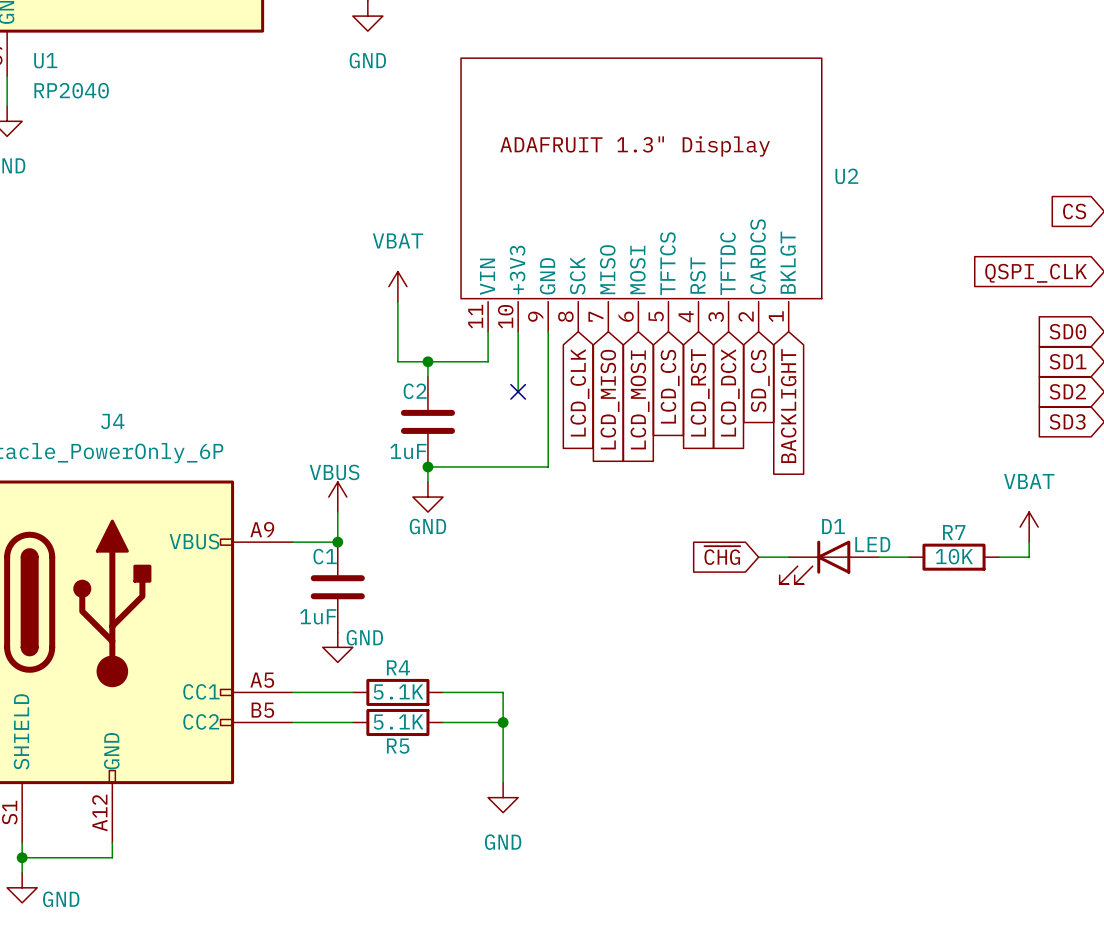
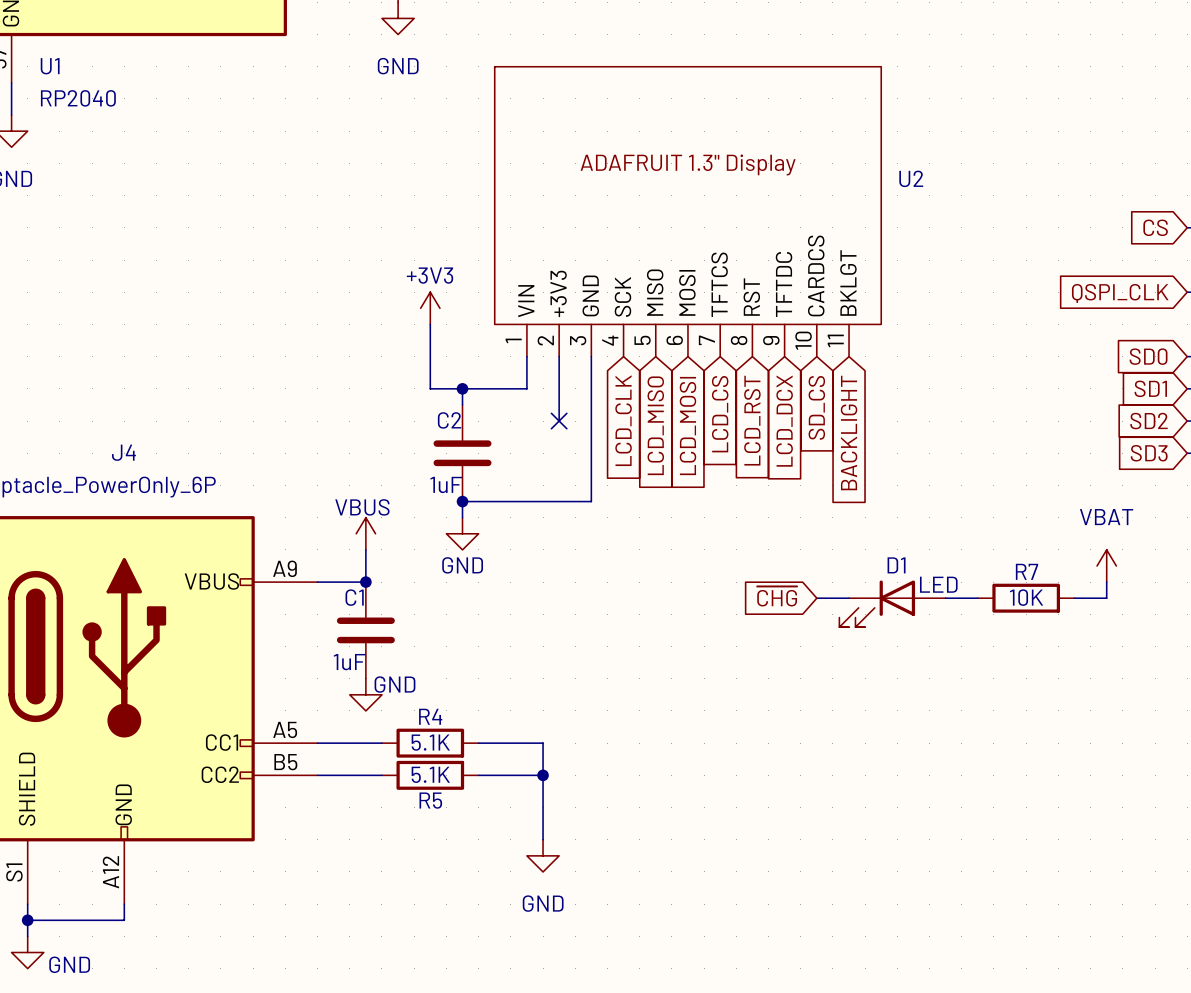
U2 symbol: [461, 58, 822, 332] -> [494, 66, 882, 357]
power symbol: VBAT (397, 286) -> +3V3 (430, 308)

